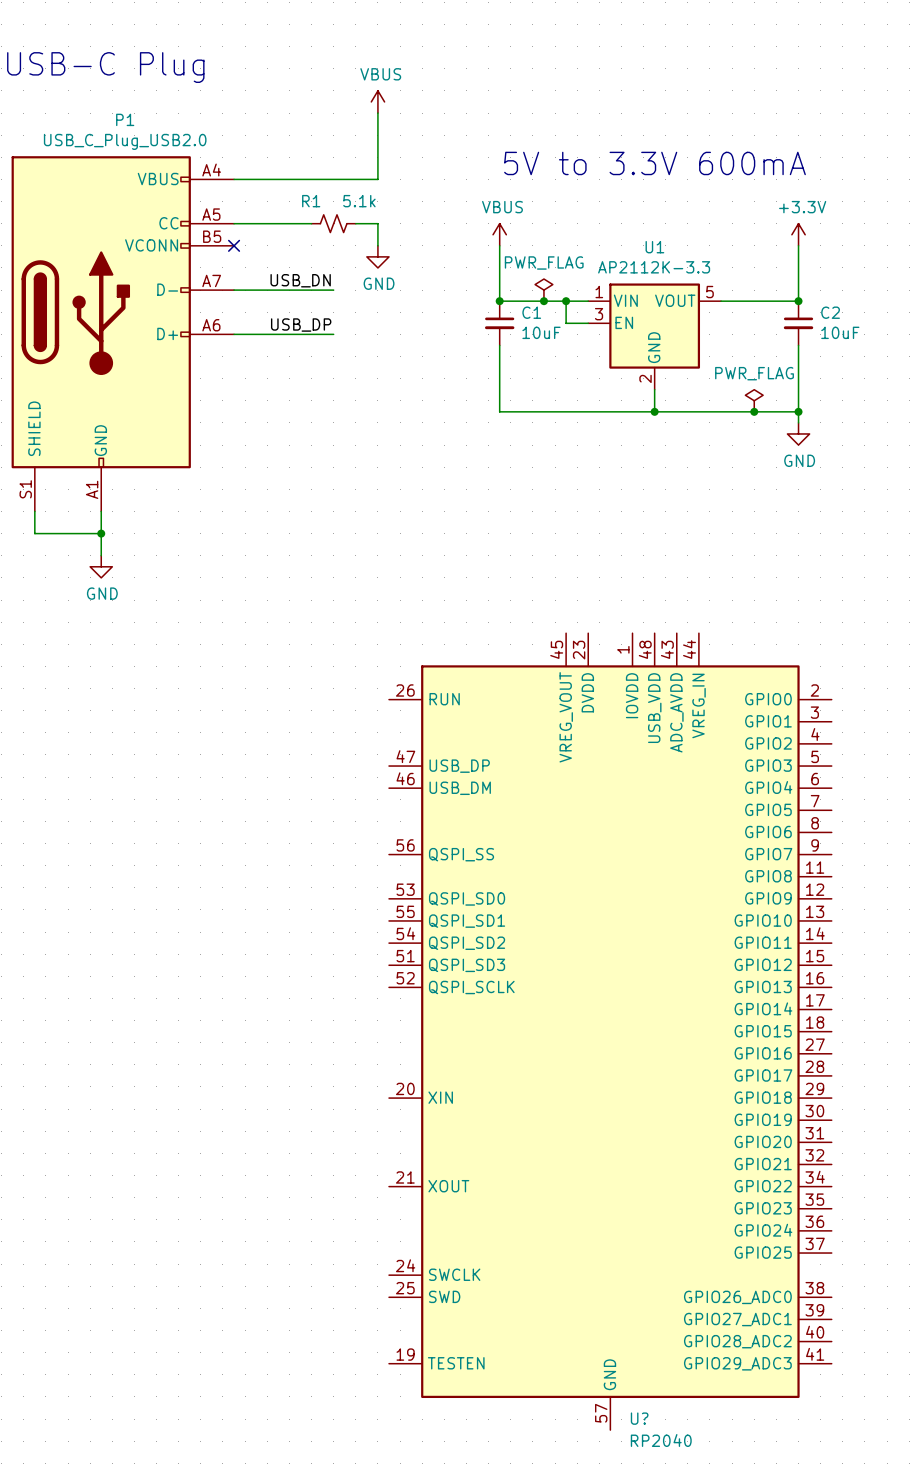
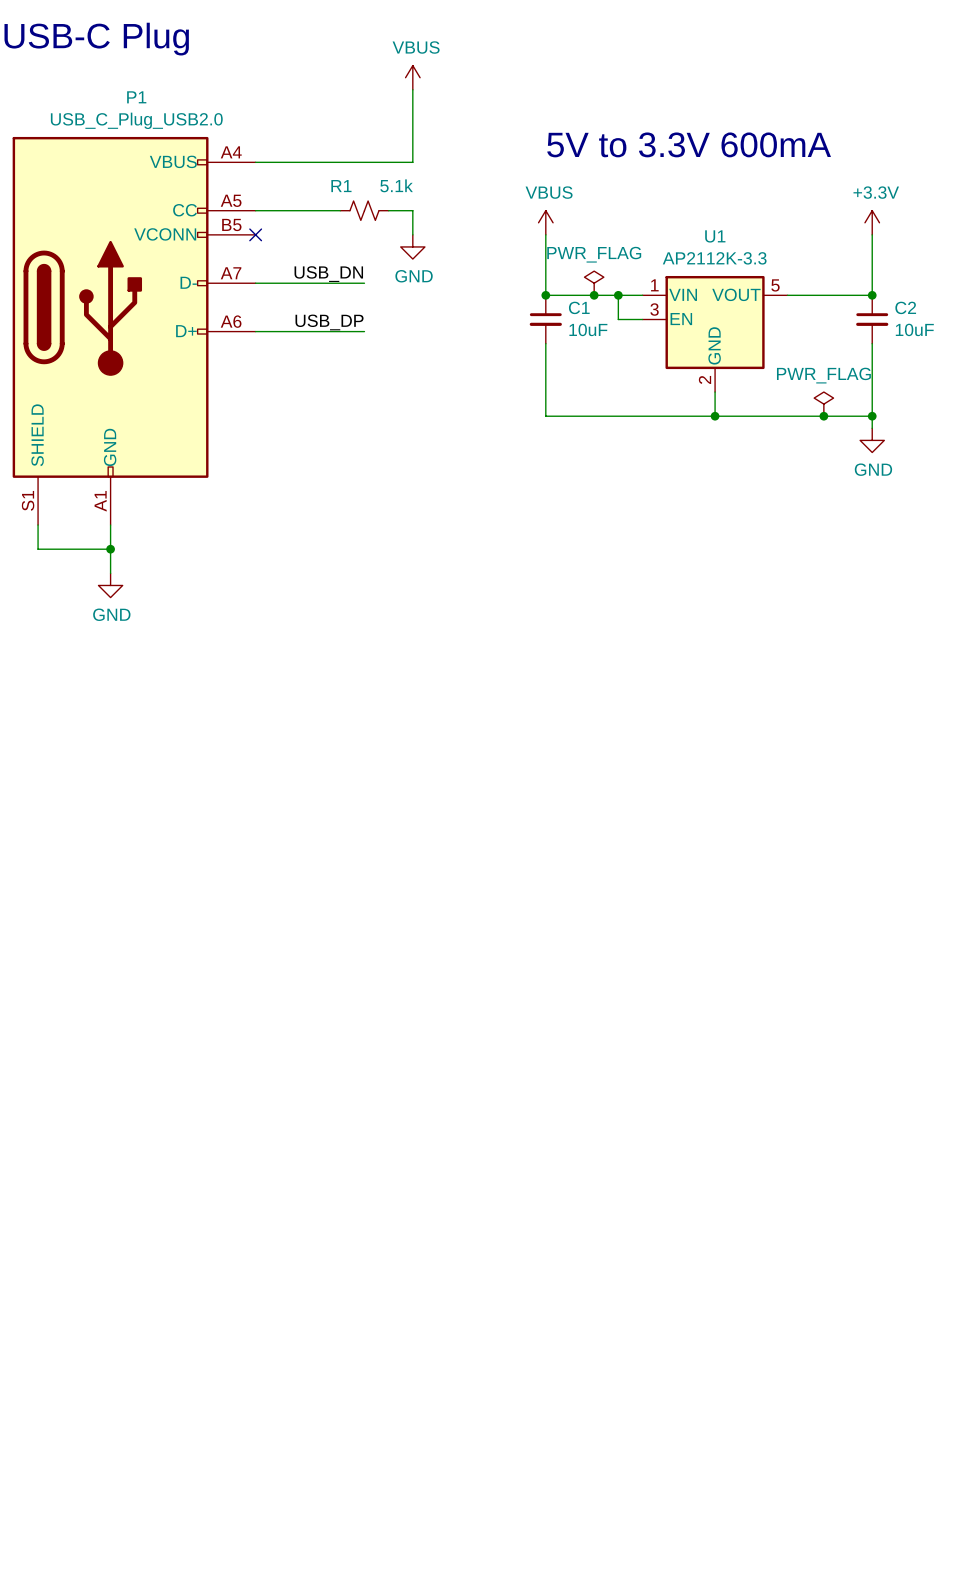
U?: RP2040 (610, 1031) -> none

